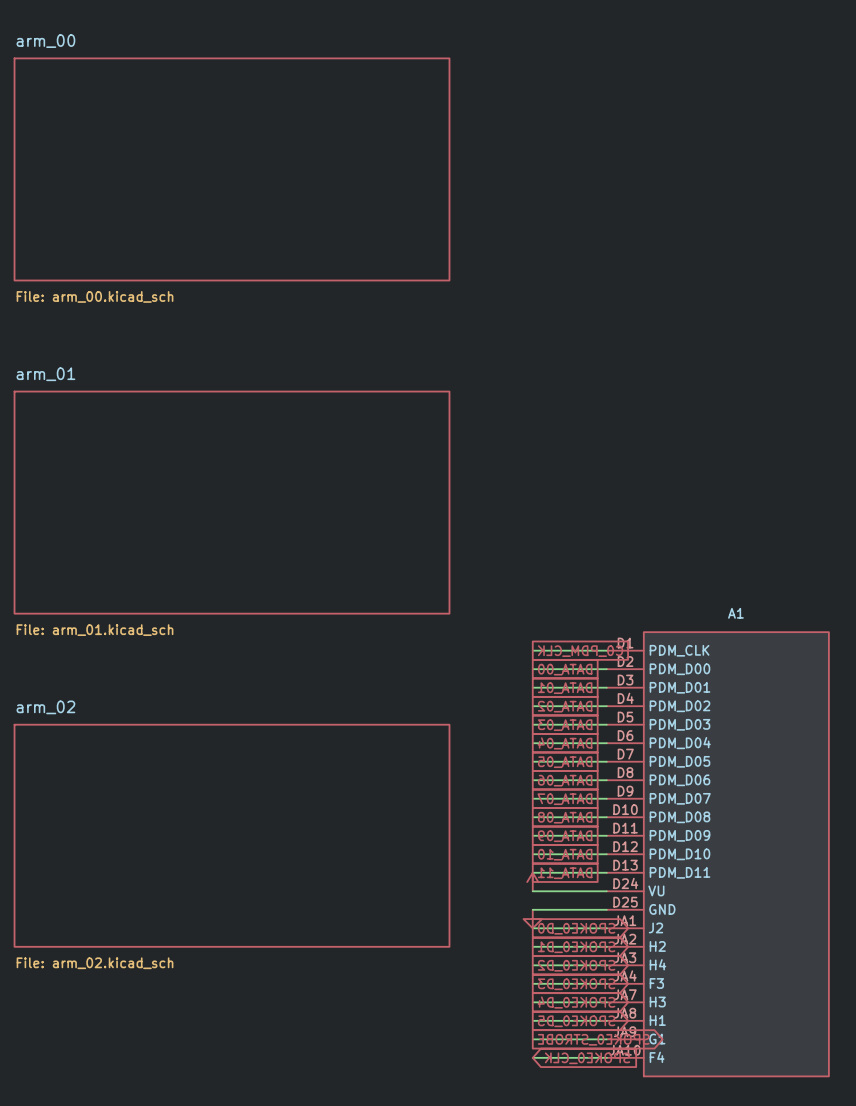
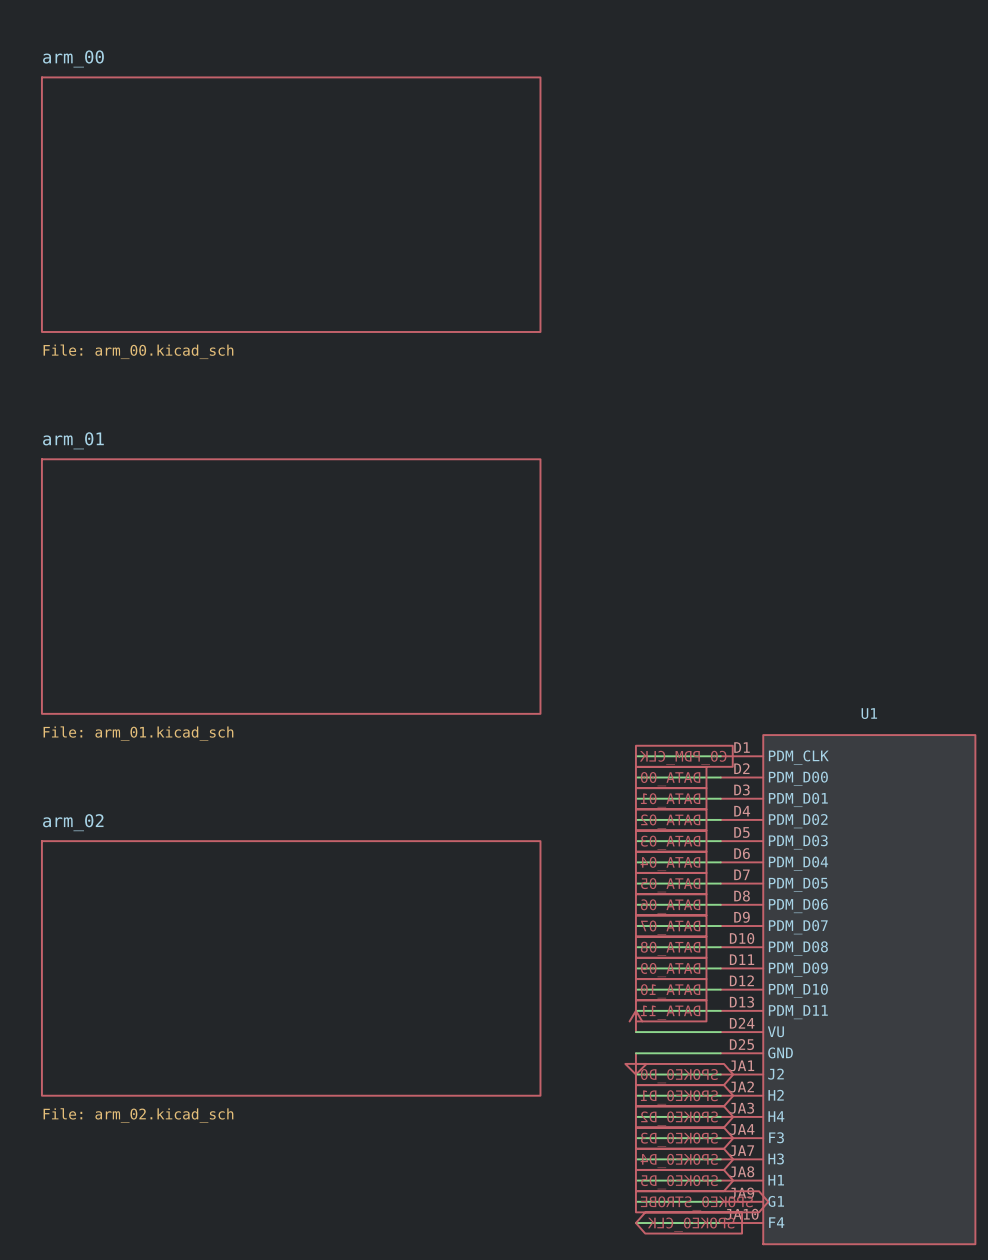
A1 name: A1 (735, 613) -> U1 (869, 713)

